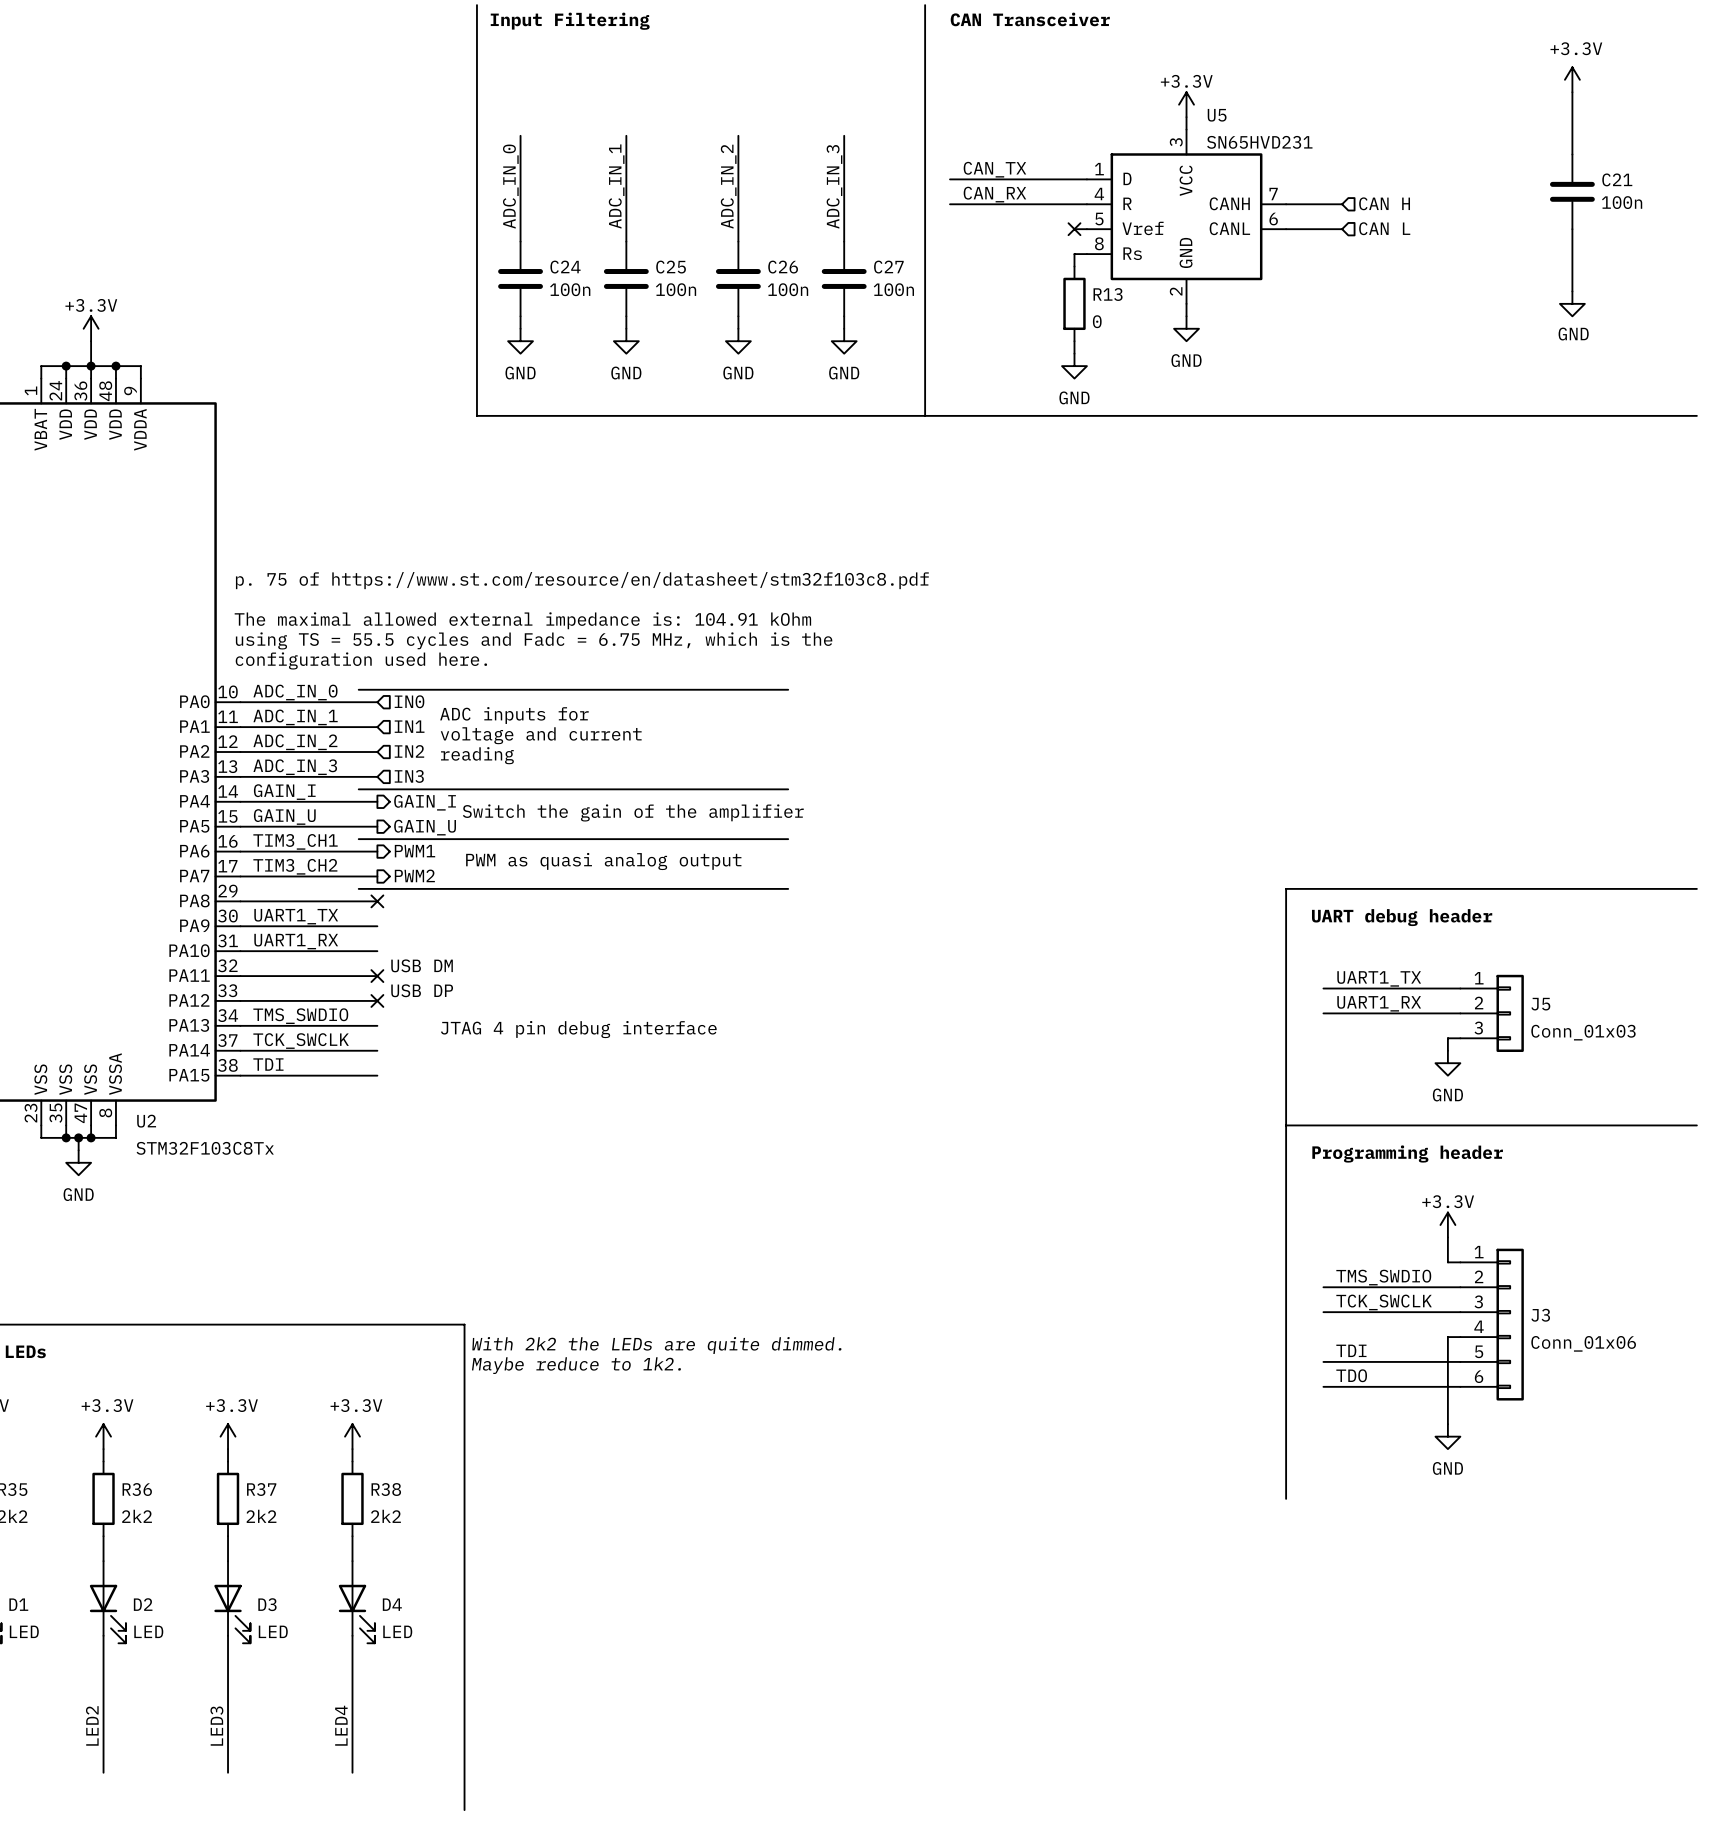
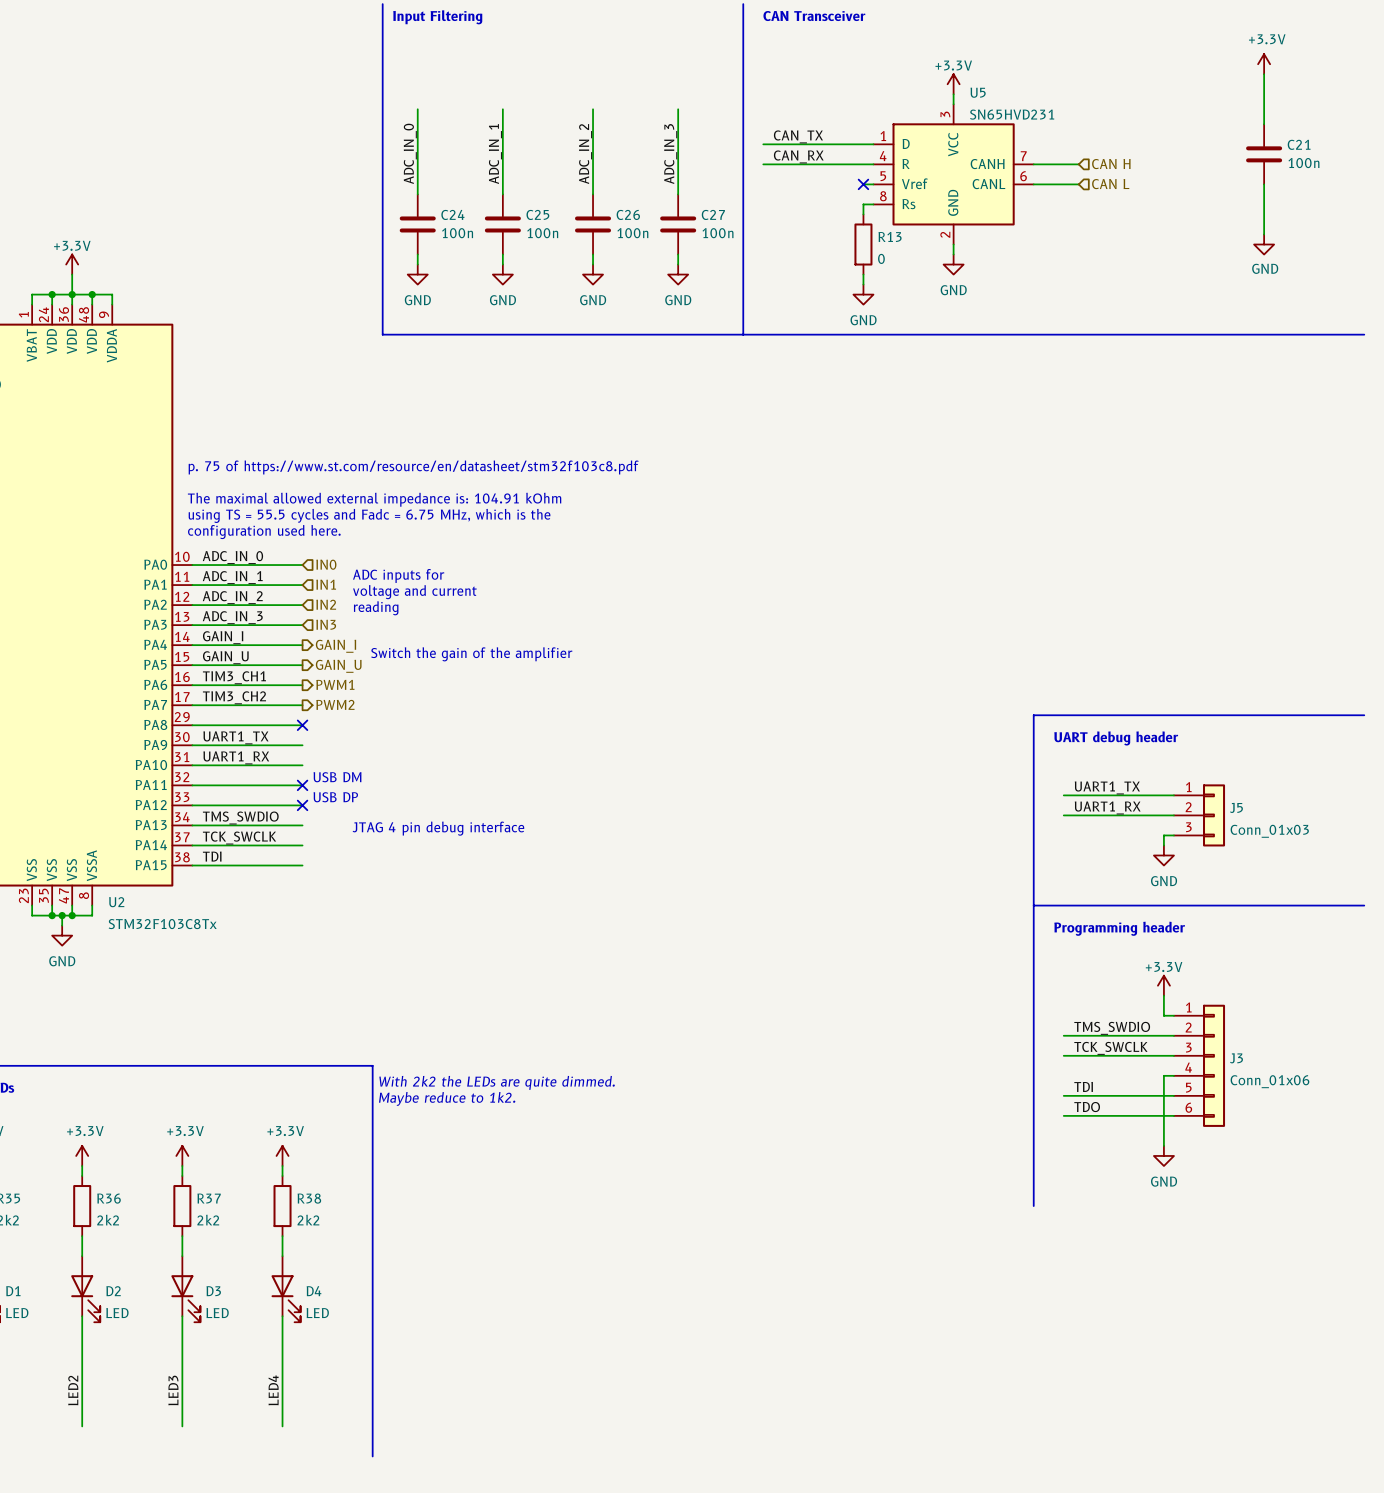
line: (358, 689) (788, 689) -> none
line: (358, 789) (788, 789) -> none
line: (358, 839) (788, 839) -> none
text: PWM as quasi analog output (603, 861) -> none
line: (358, 888) (788, 888) -> none

